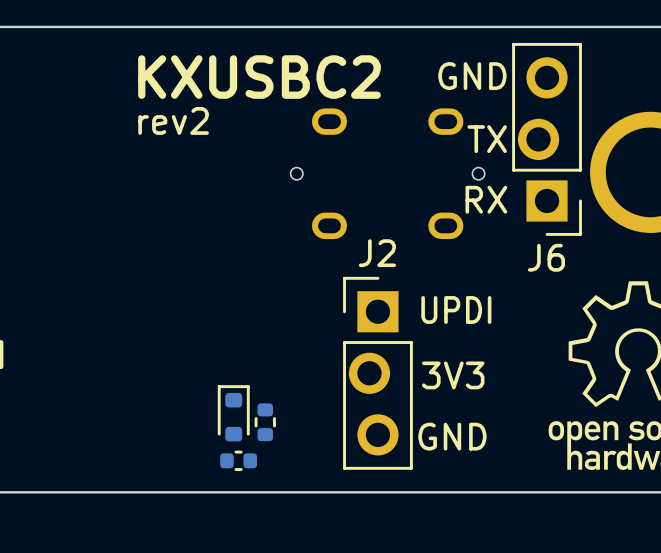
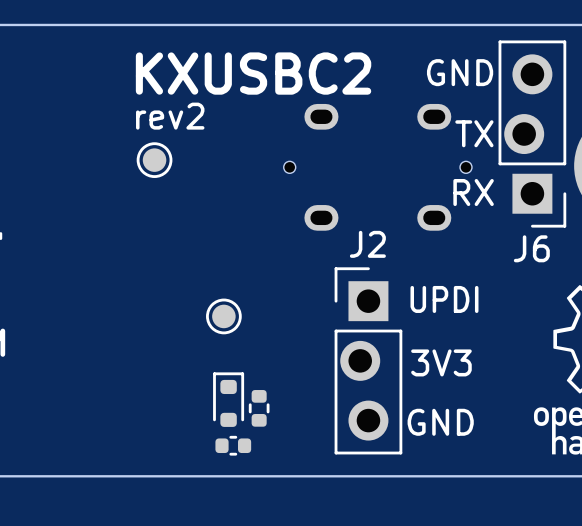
part: none -> (154, 160)
part: none -> (223, 316)

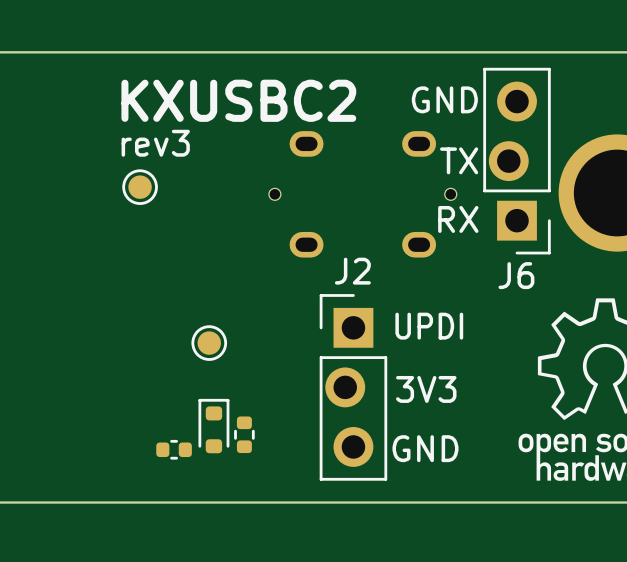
text: rev2 (170, 116) -> rev3 (155, 143)
part position: (233, 445) -> (174, 449)

